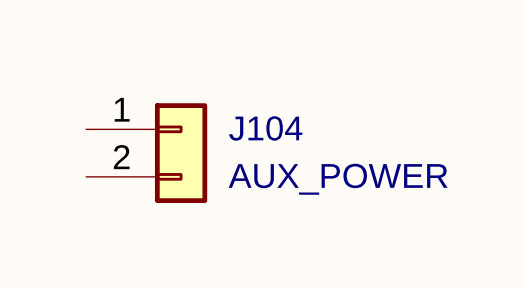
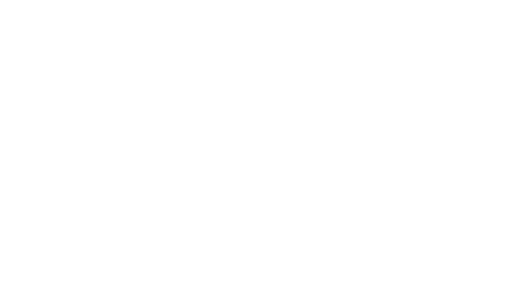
J104: AUX_POWER (146, 153) -> none

